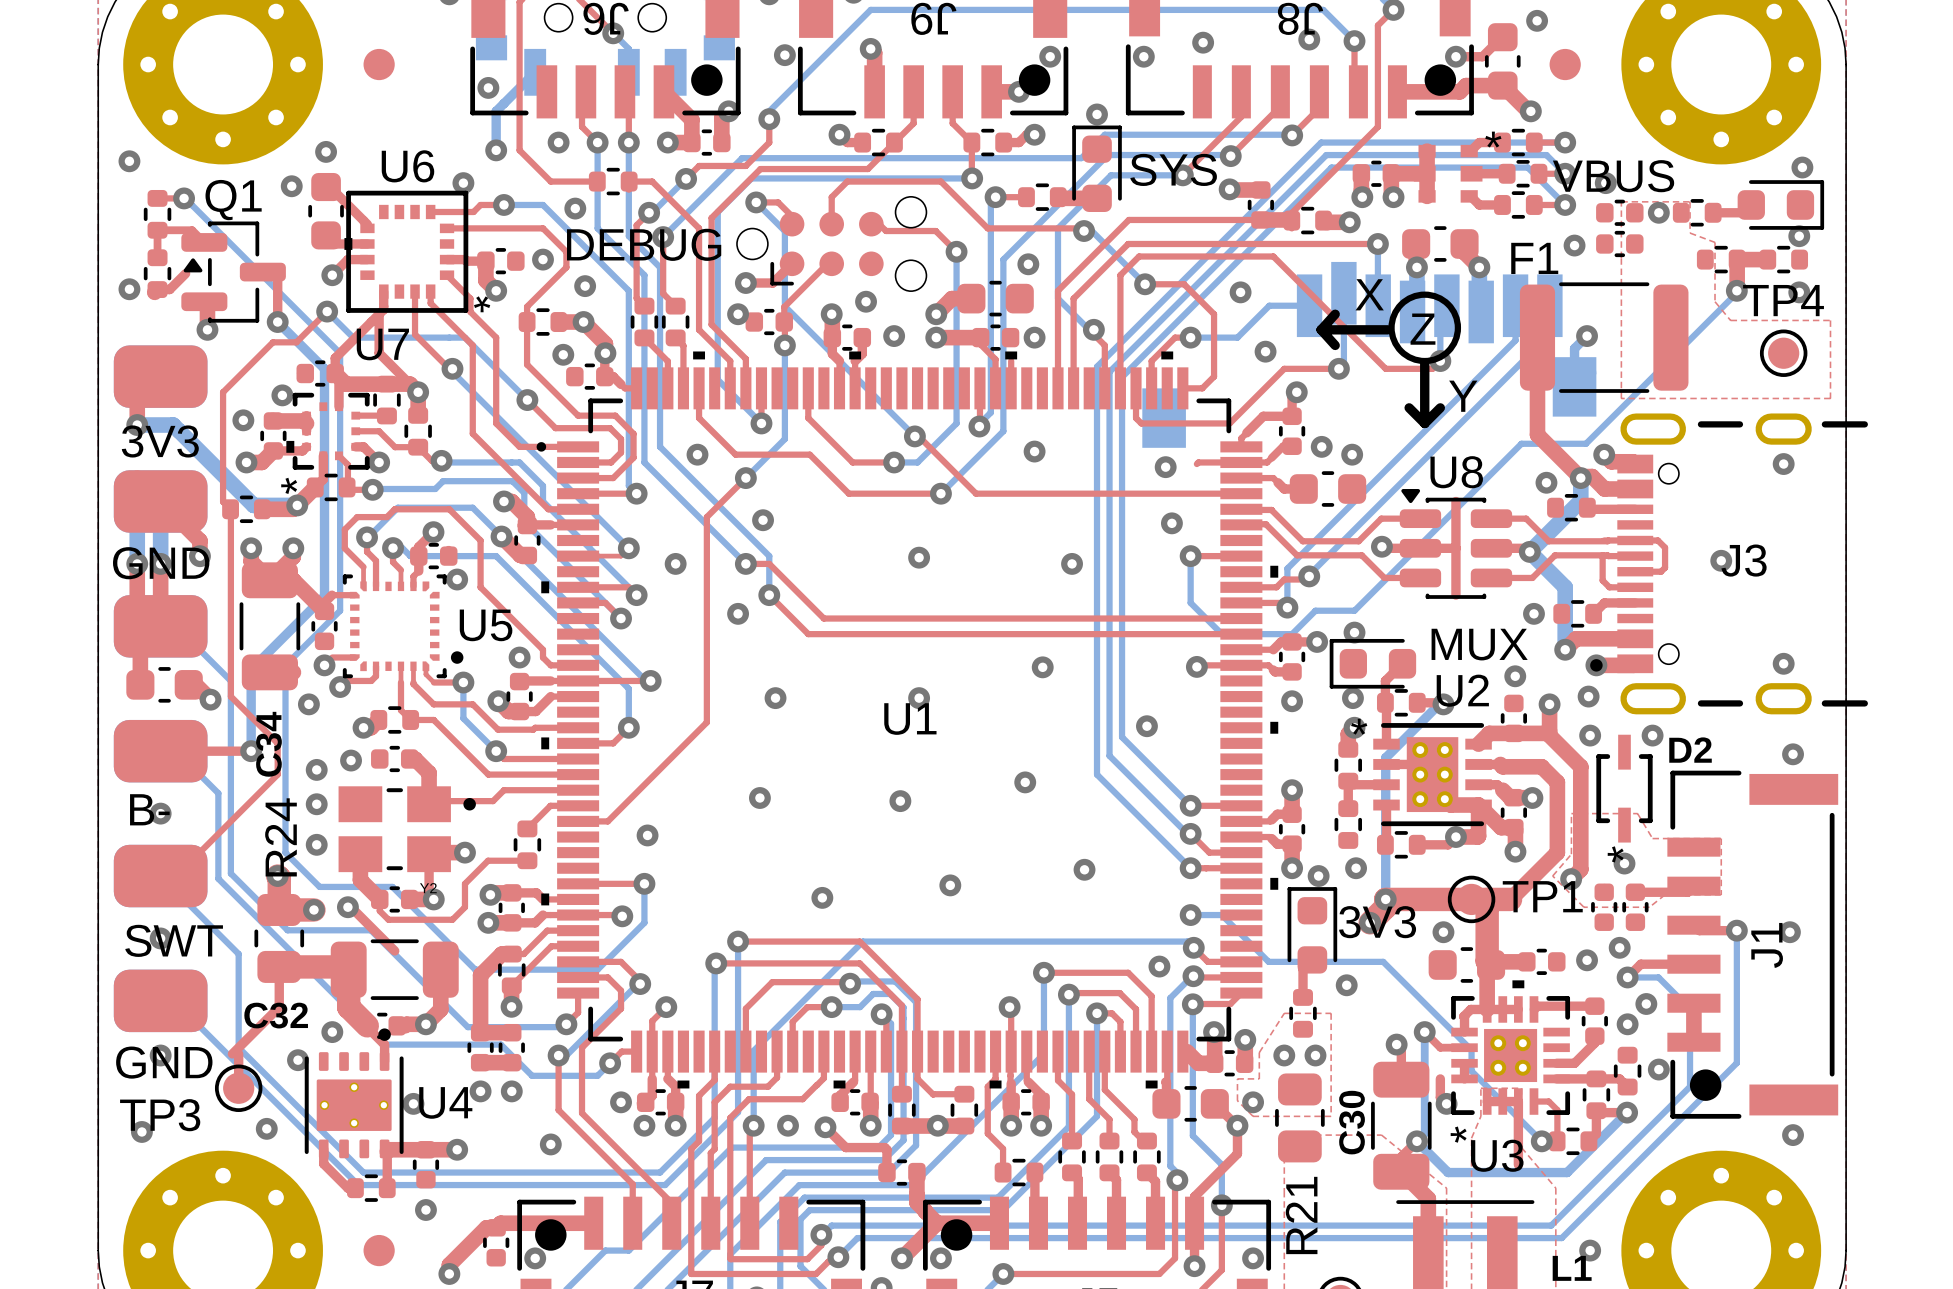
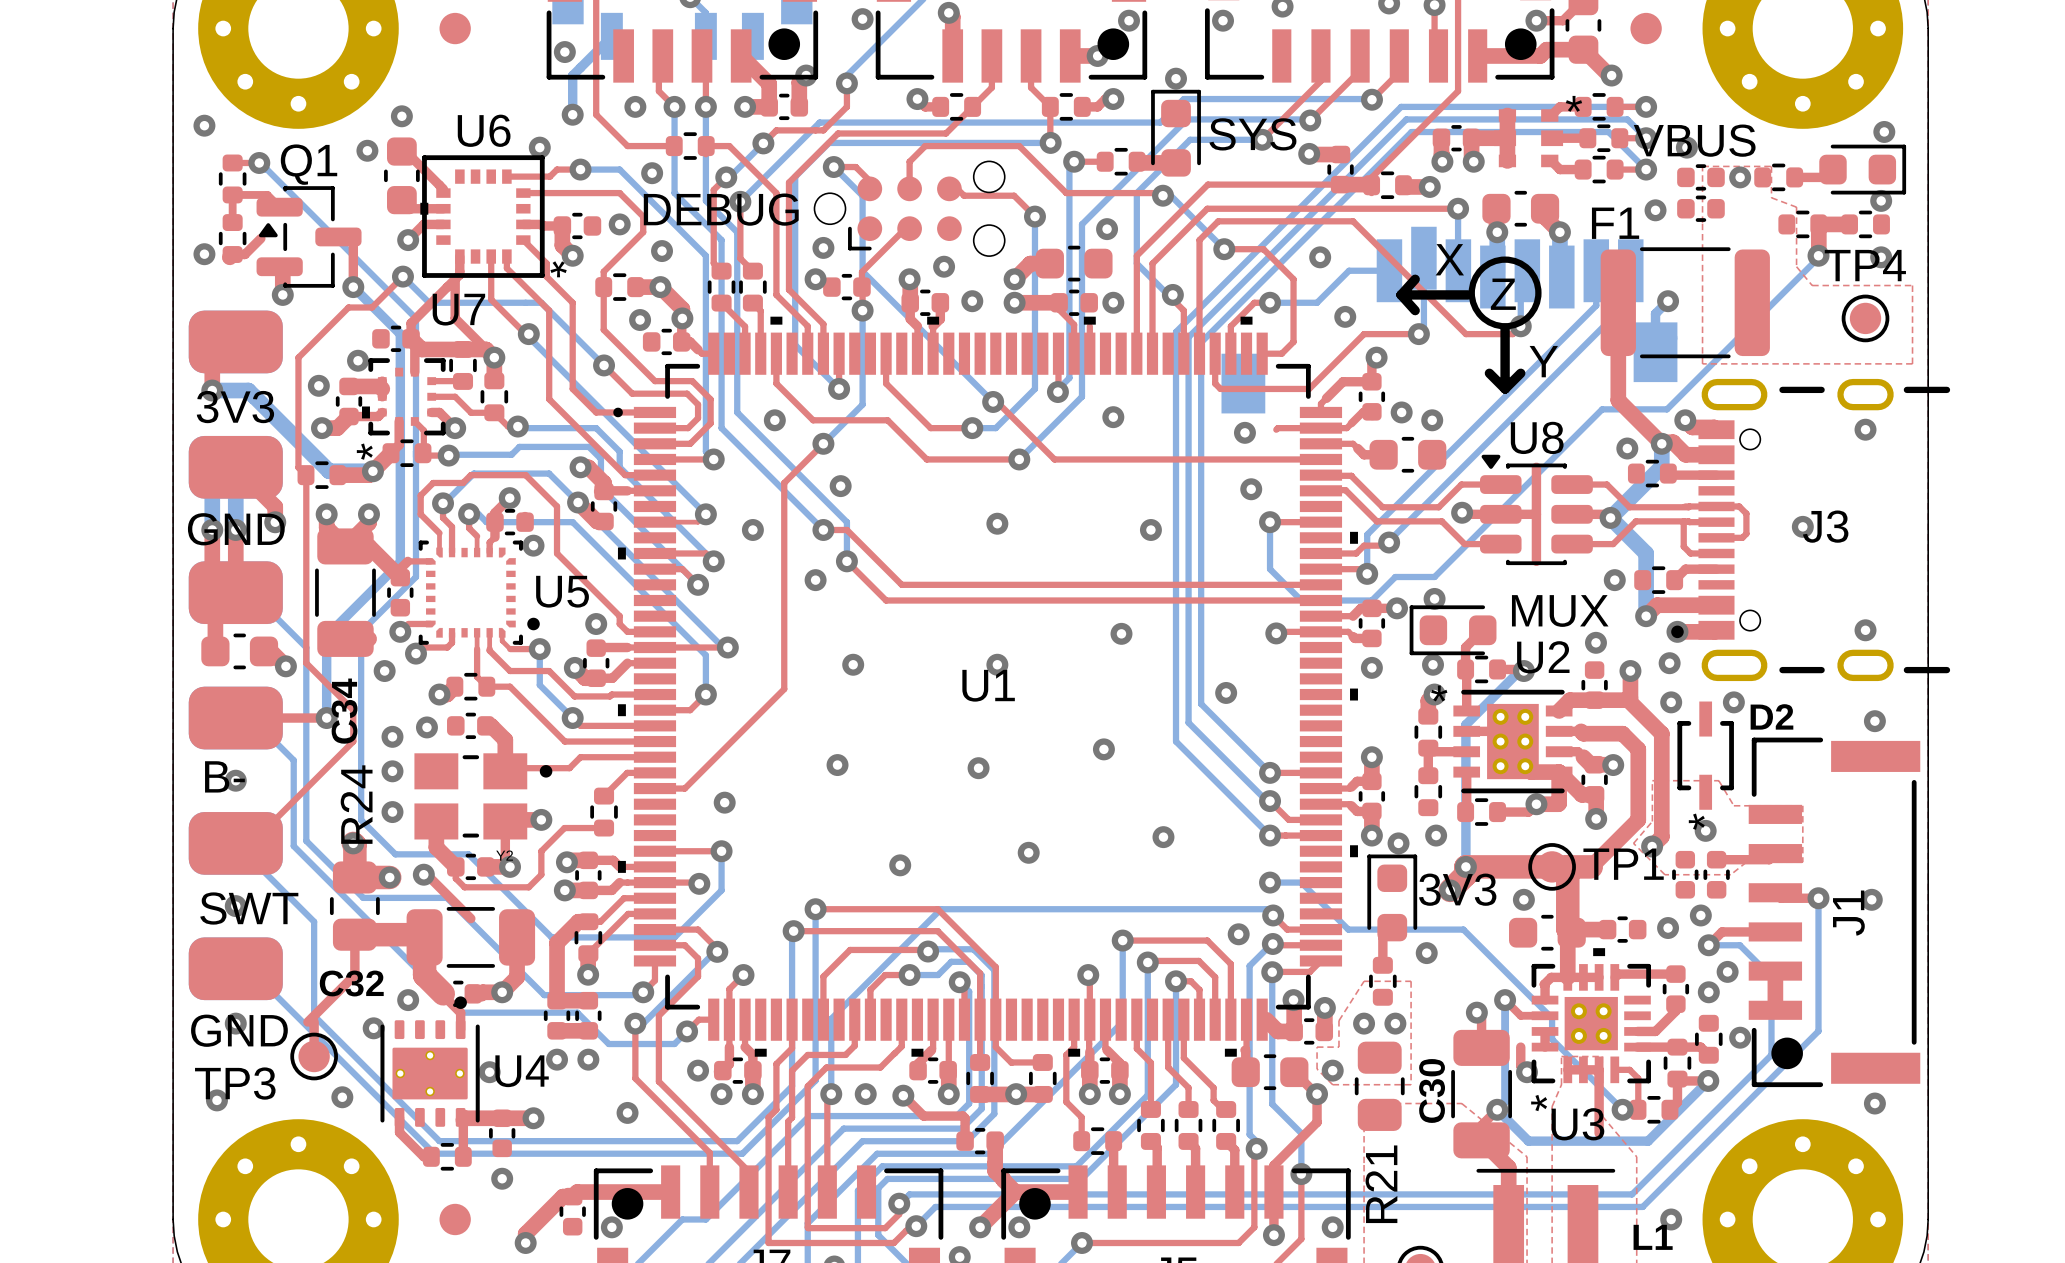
top track: (792, 263) (772, 283) (745, 283) -> none

